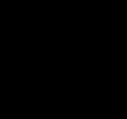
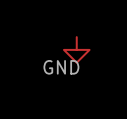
power symbol: none -> GND (76, 49)

